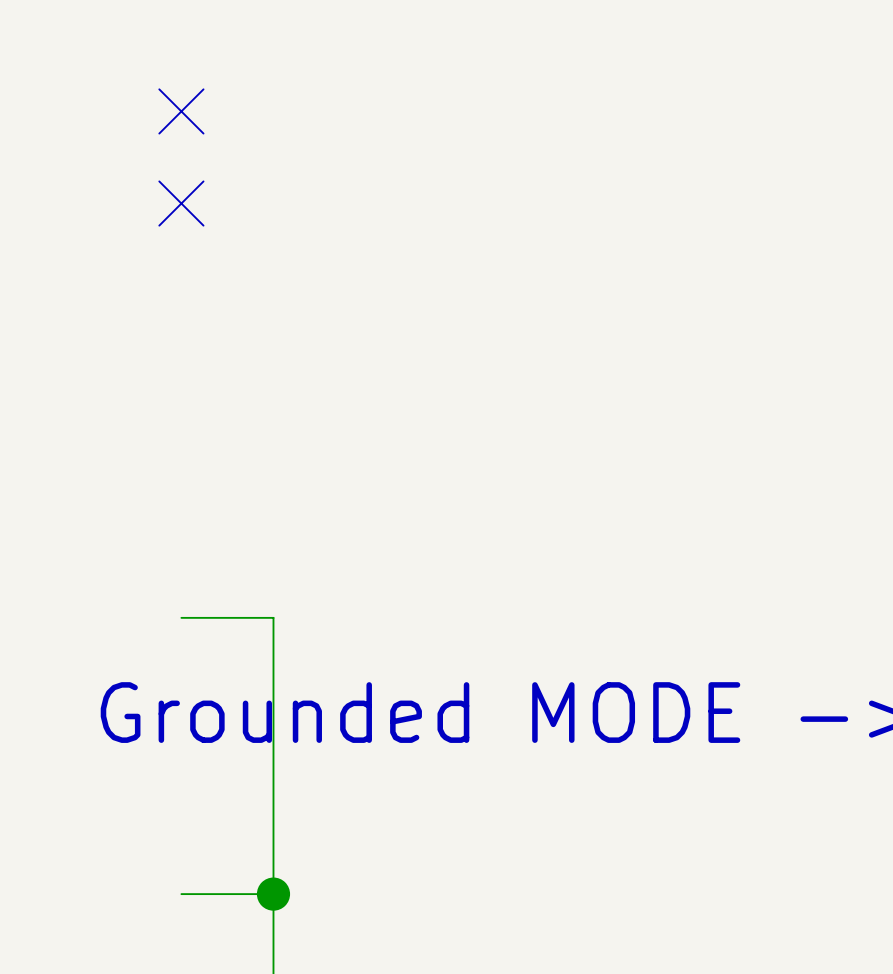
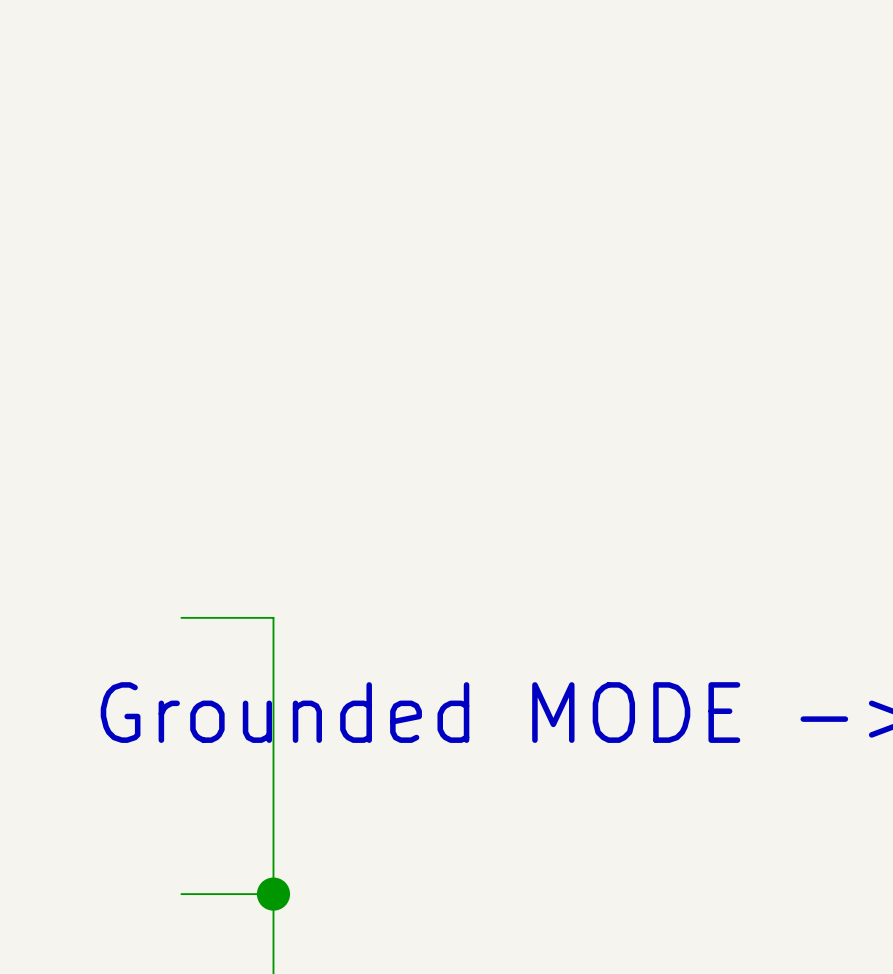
no-connect mark: (181, 111) -> none
no-connect mark: (181, 203) -> none

